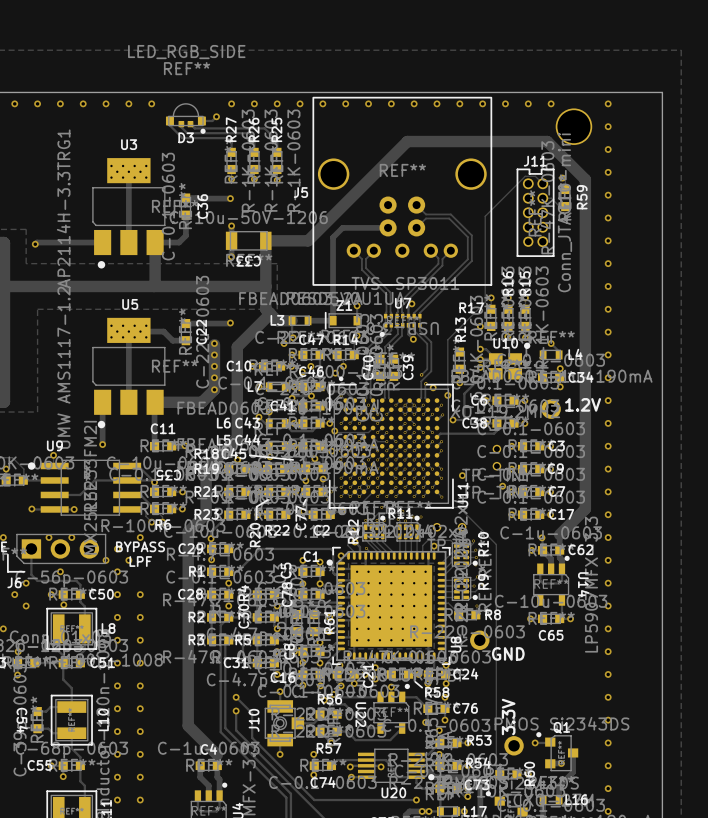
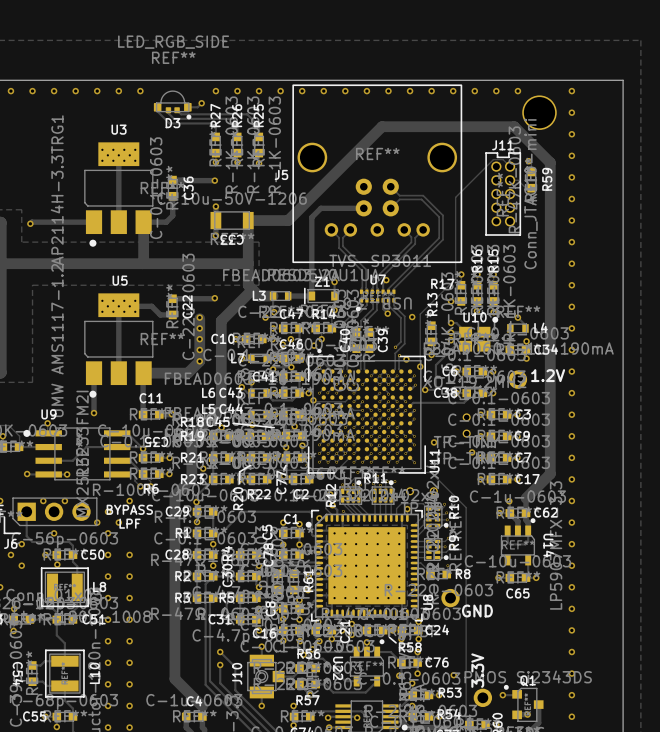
via: none -> (412, 317)
via: none -> (203, 468)
via: none -> (453, 675)

